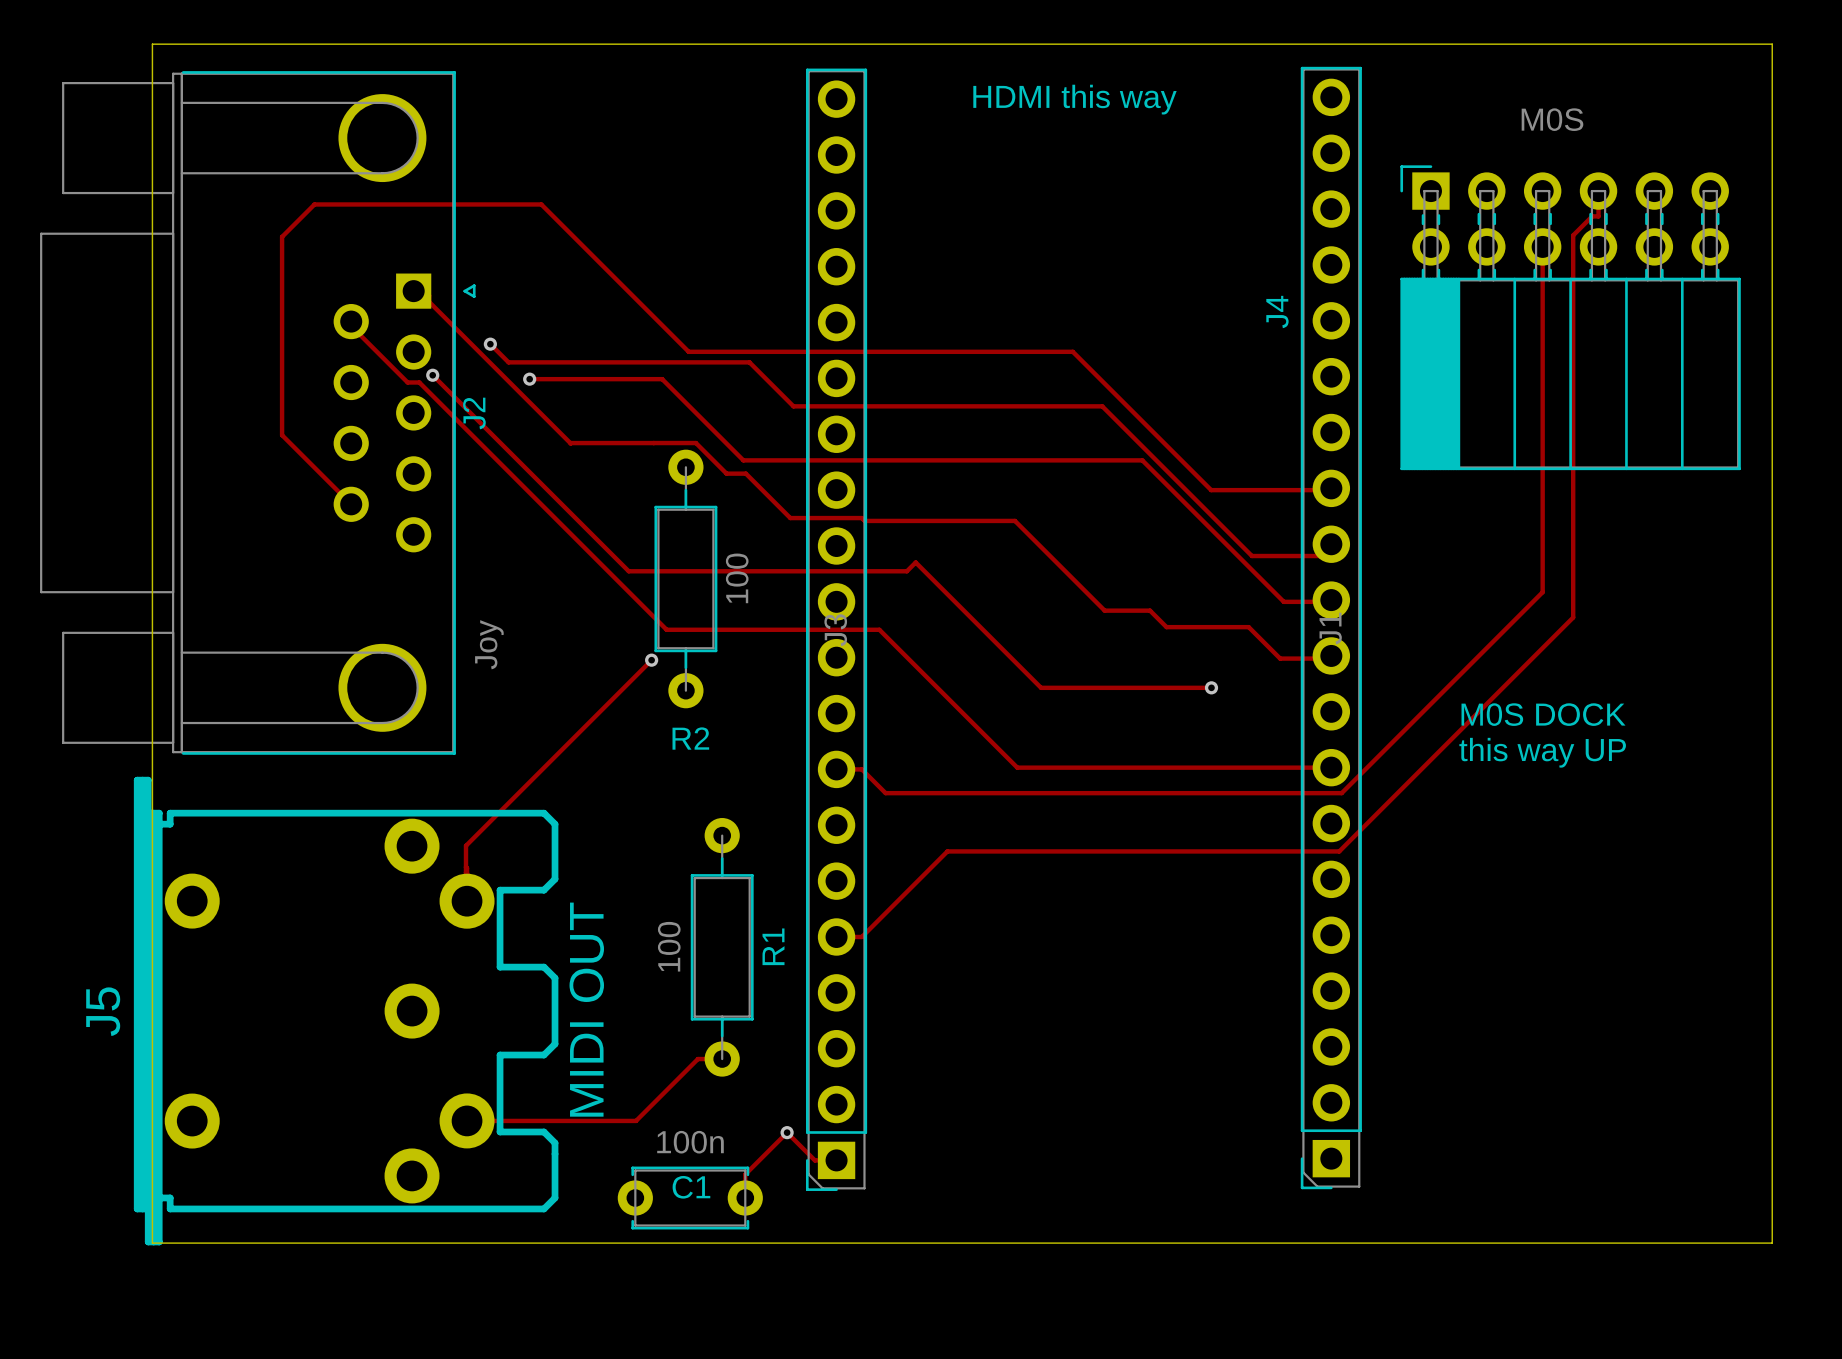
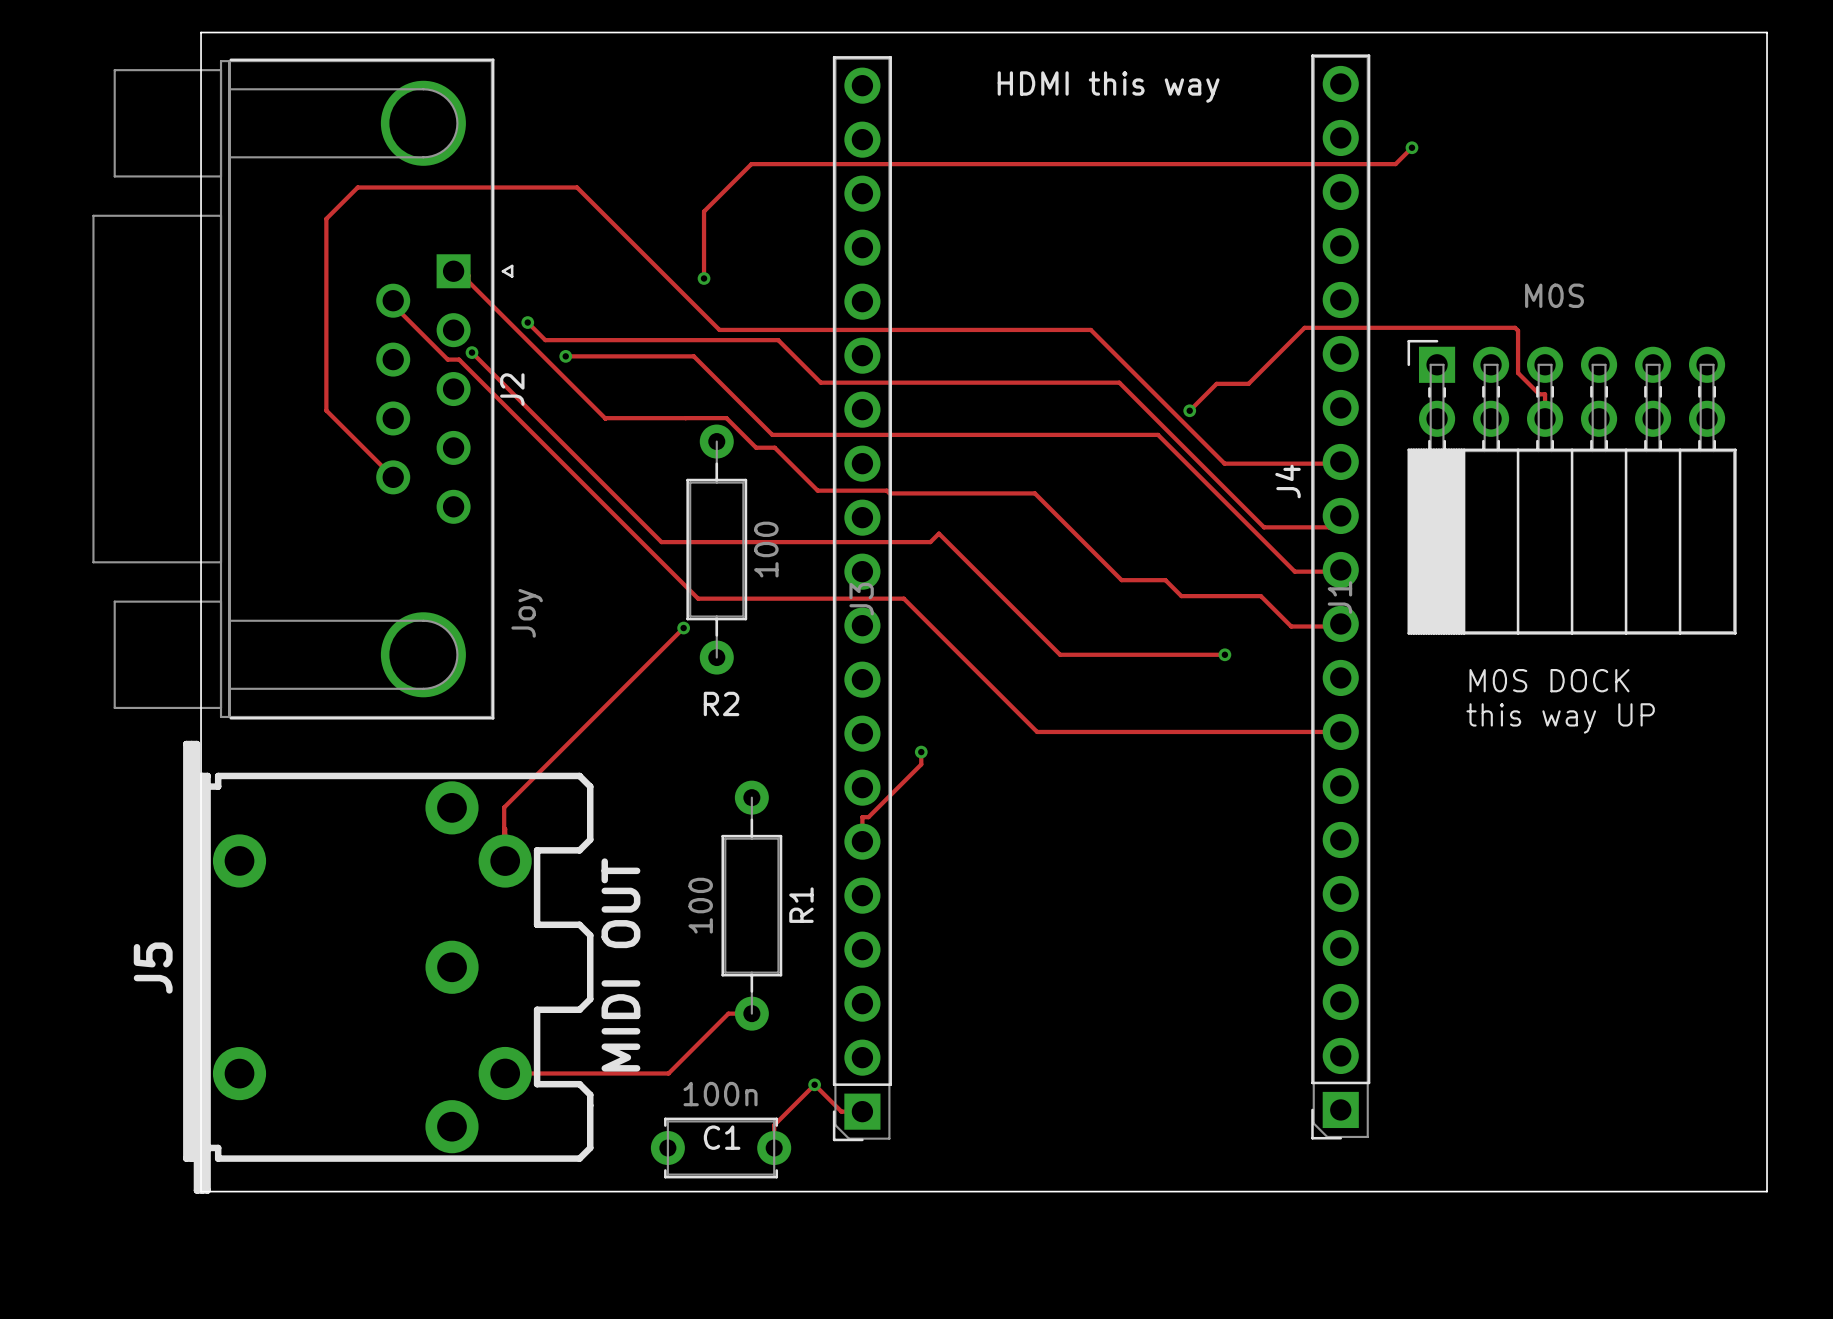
track: none -> (1411, 147) (1395, 164) (751, 164) (704, 211) (704, 278)
via: none -> (1411, 147)
track: (1598, 191) (1598, 216) (1592, 216) (1573, 235) (1573, 617) (1339, 851) (947, 851) (861, 936) (836, 936) -> none
track: (1542, 246) (1542, 418) -> (1189, 410) (1216, 383) (1248, 383) (1304, 327) (1515, 327) (1518, 330) (1518, 373) (1539, 394) (1545, 394)
via: none -> (704, 278)
J4 position: (1570, 317) -> (1572, 487)
via: none -> (1189, 410)
track: (1542, 443) (1542, 592) (1341, 793) (885, 793) (861, 769) (836, 769) -> none
track: none -> (921, 752) (921, 764) (868, 817) (862, 817) (862, 841)
via: none -> (921, 752)

